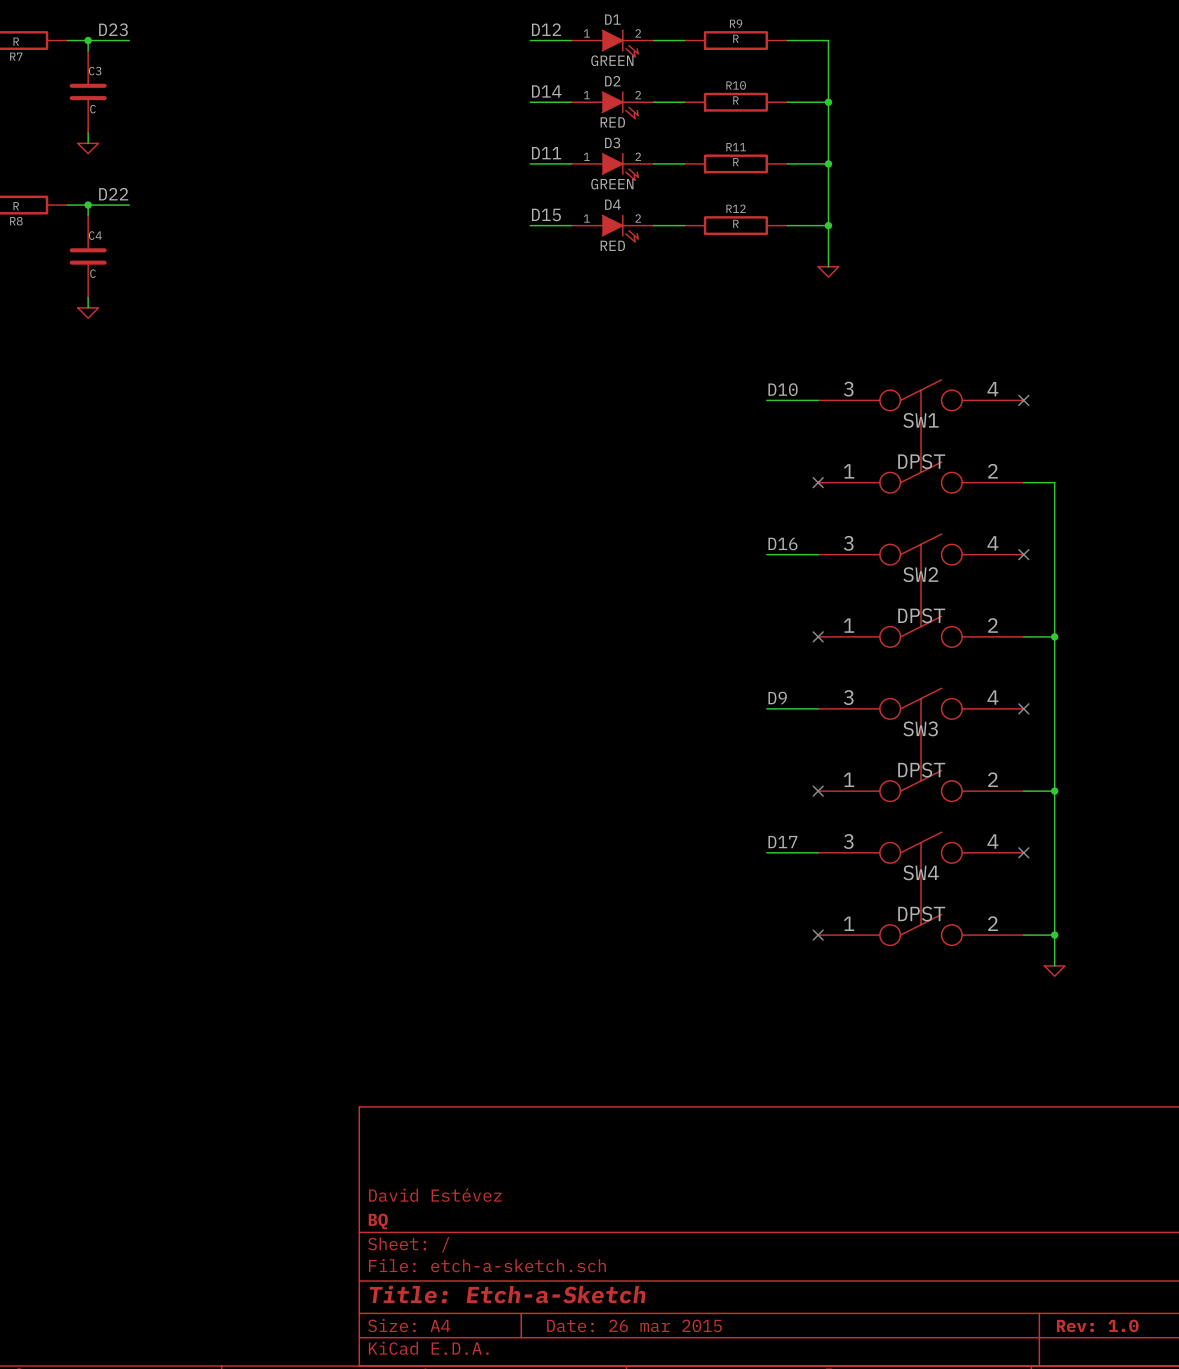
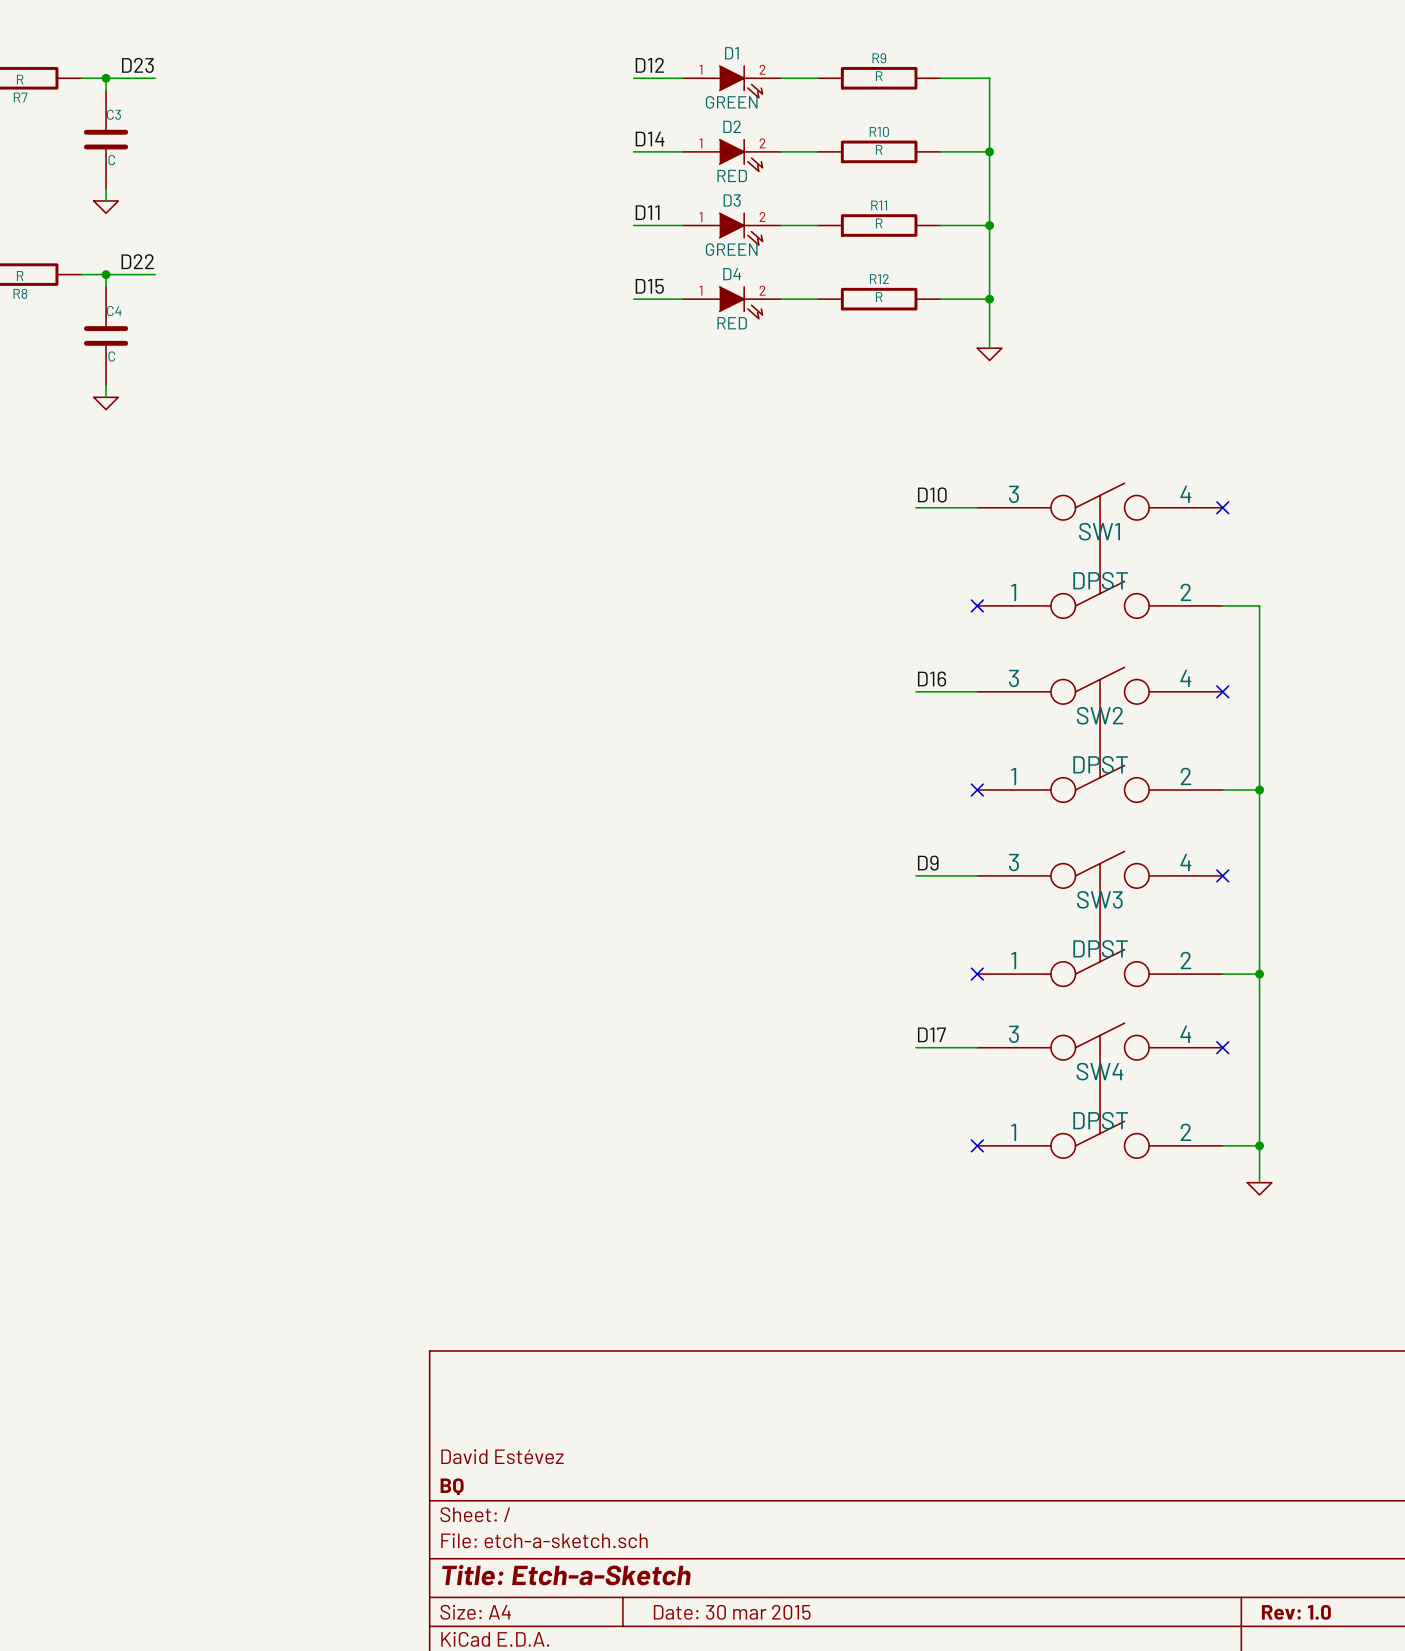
title block: Date: 26 mar 2015 (634, 1325) -> Date: 30 mar 2015 (732, 1612)

